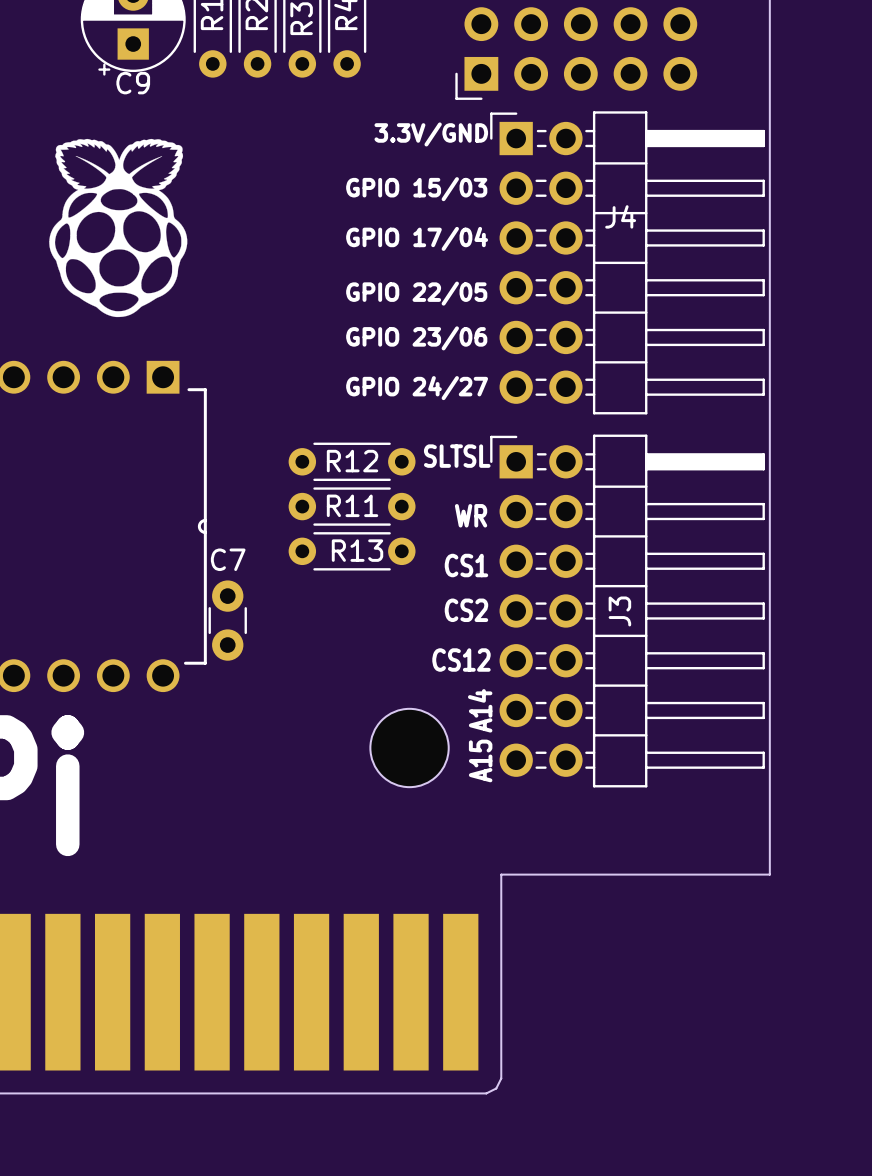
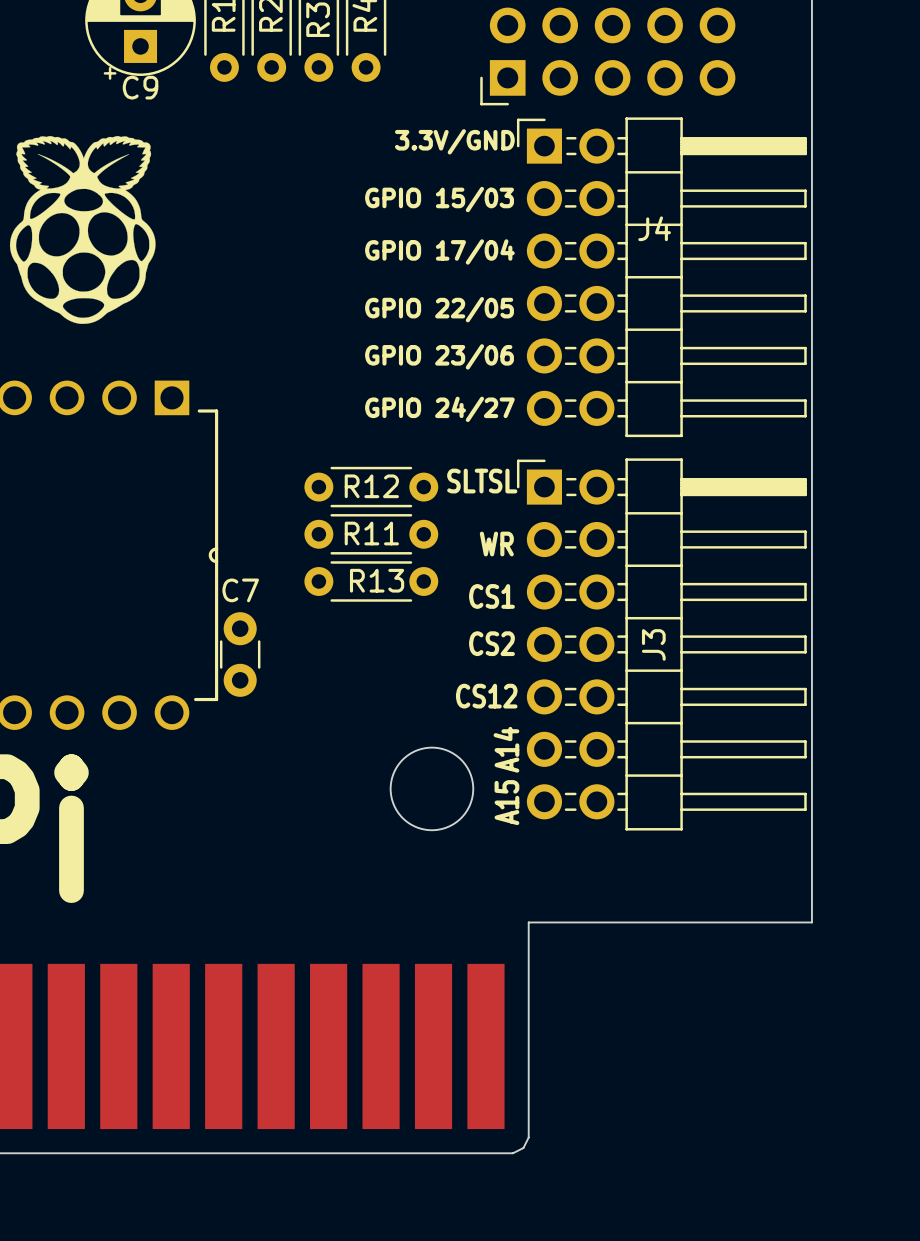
drawing position: (118, 227) -> (82, 229)

